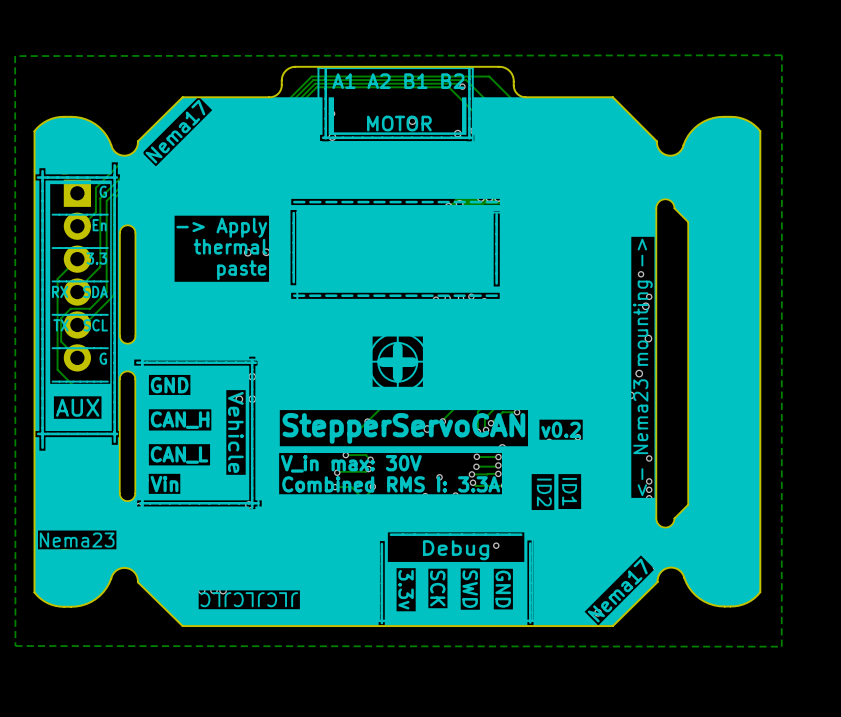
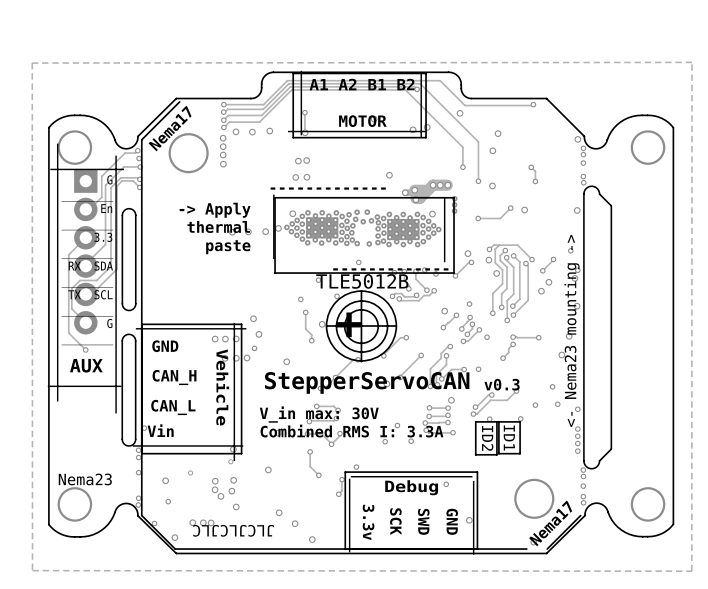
drawing: [34, 97, 761, 626] -> none
text: v0.2 (561, 429) -> v0.3 (502, 384)

